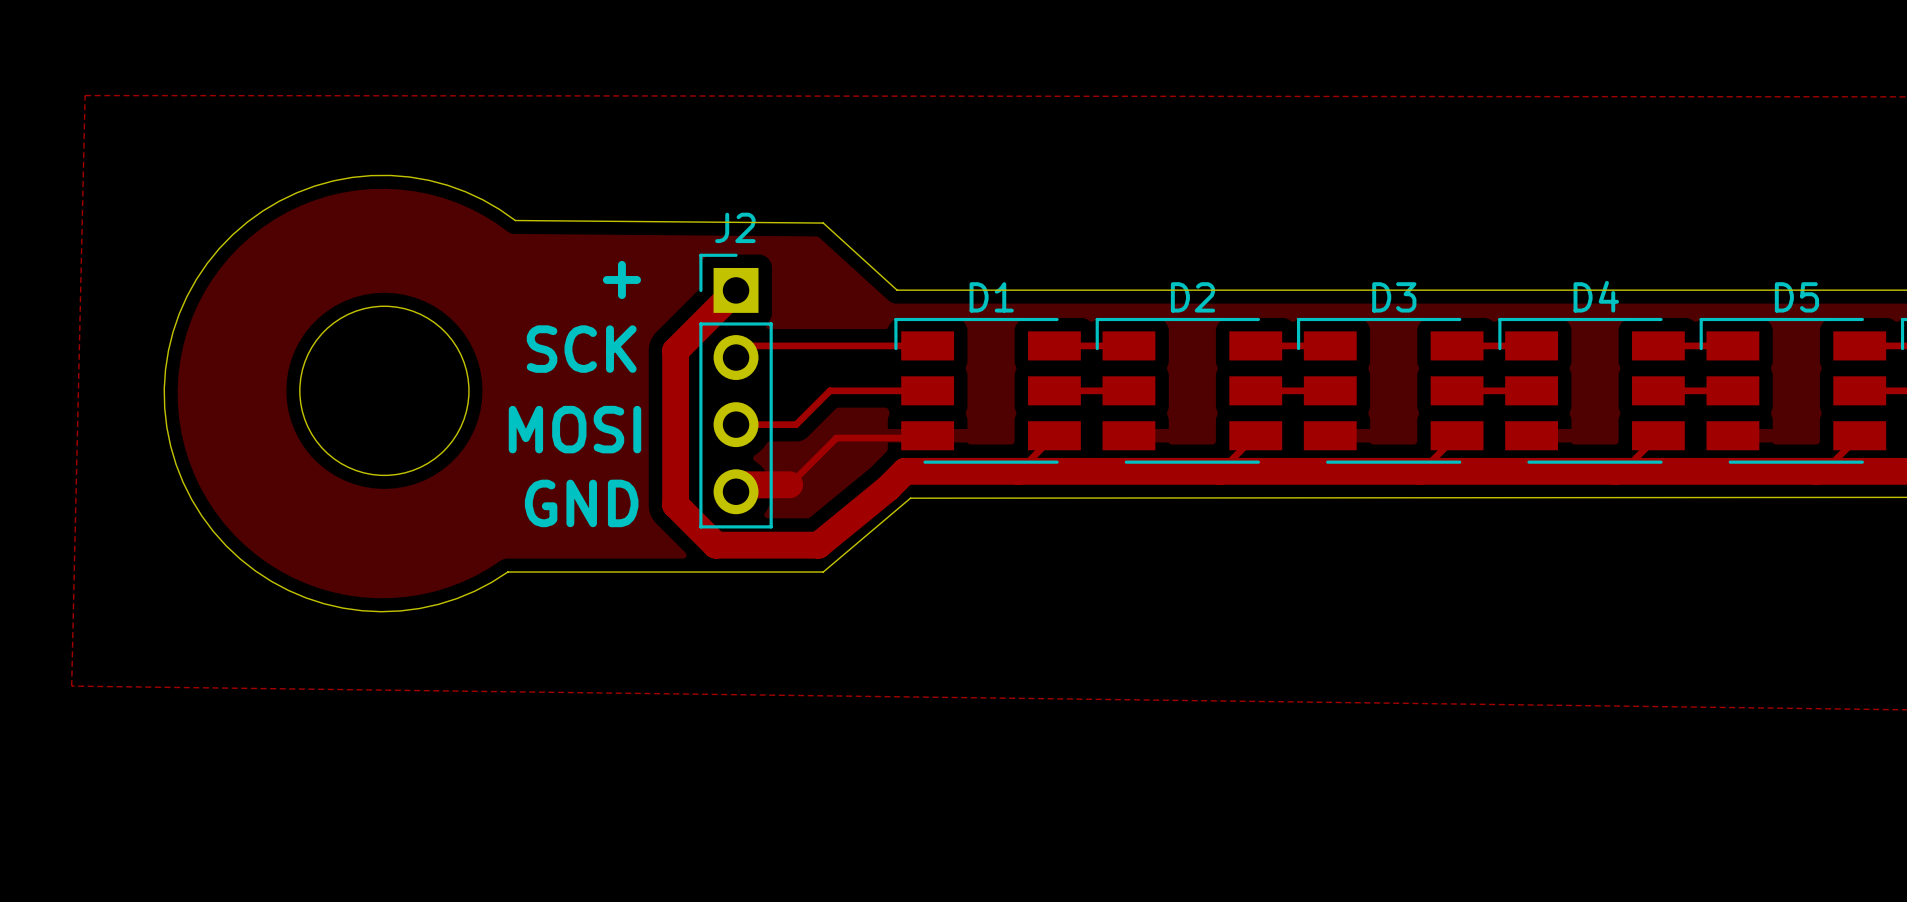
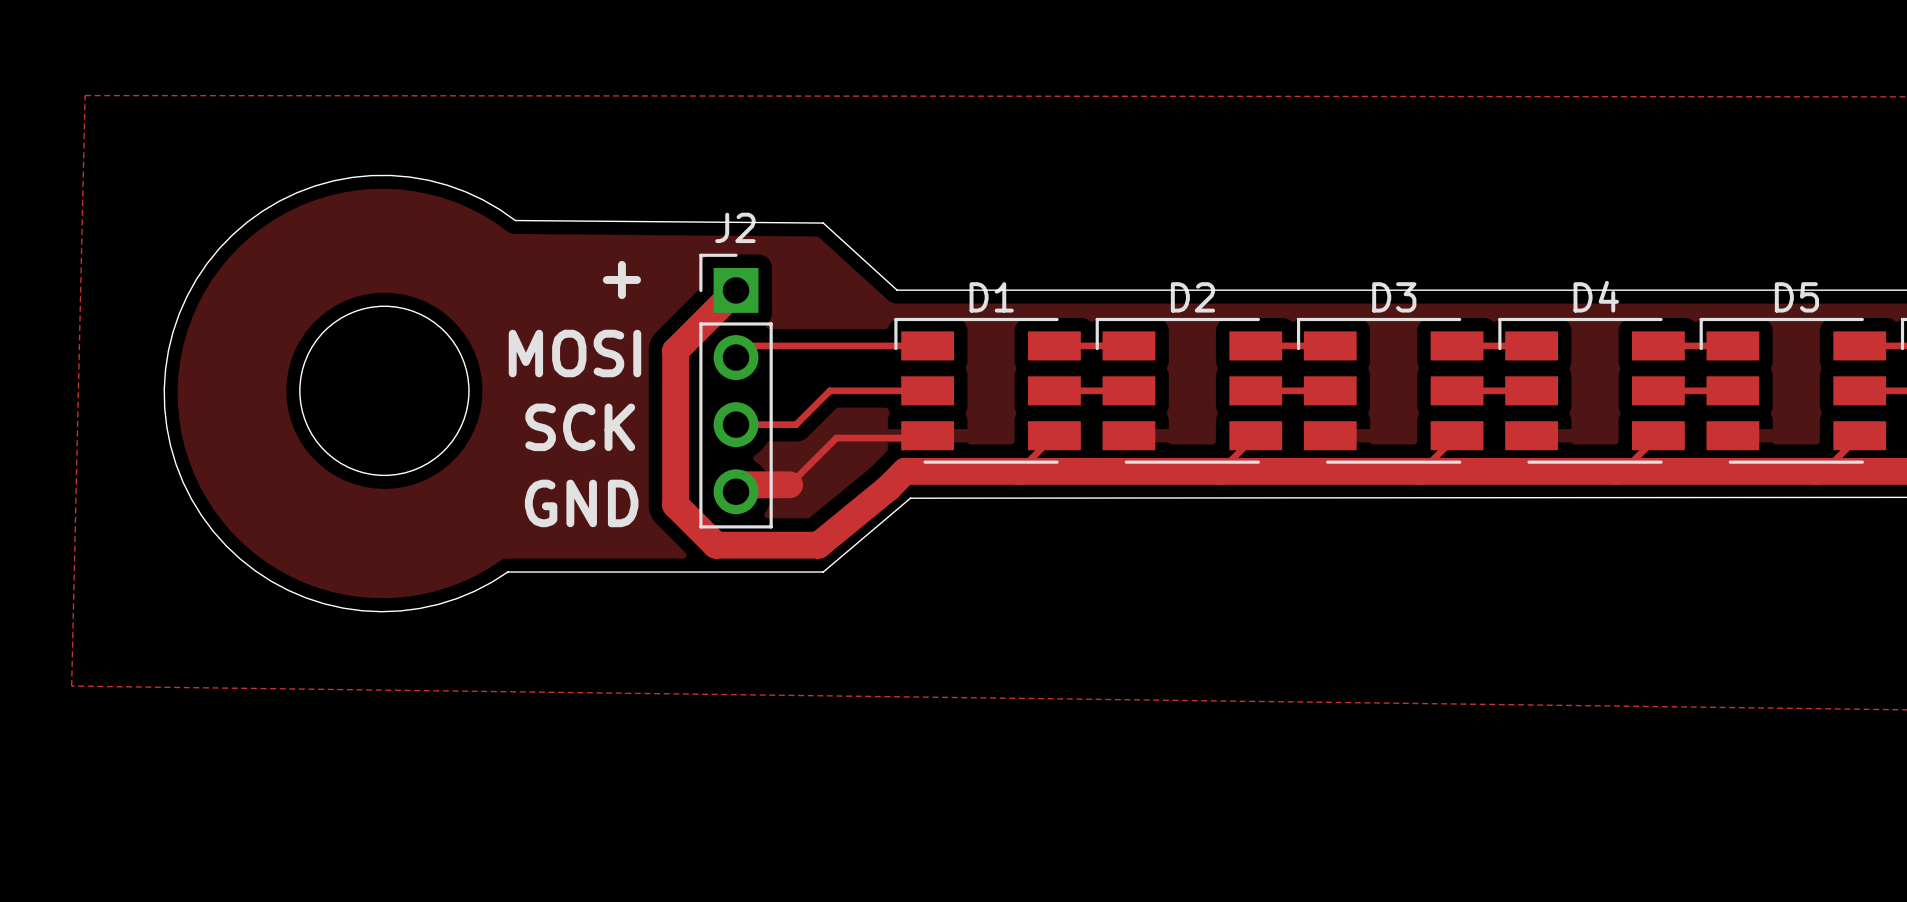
text position: SCK (581, 349) -> SCK (580, 427)
text position: MOSI (574, 429) -> MOSI (574, 353)

